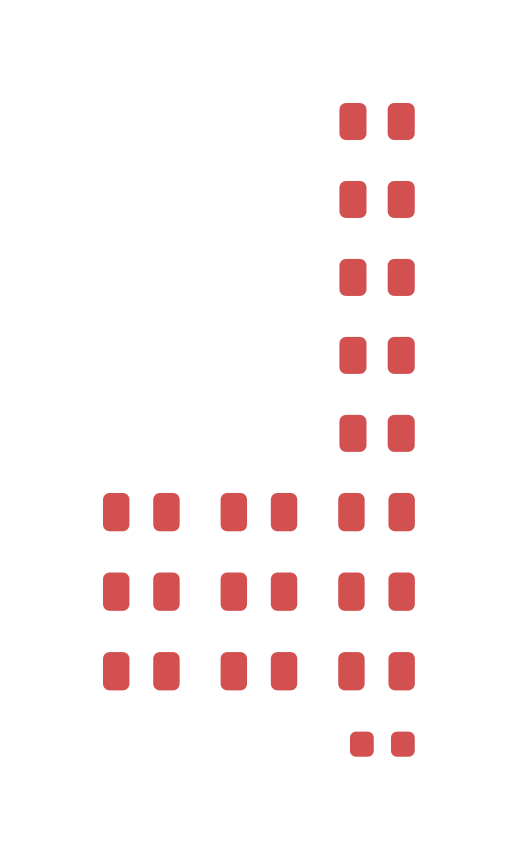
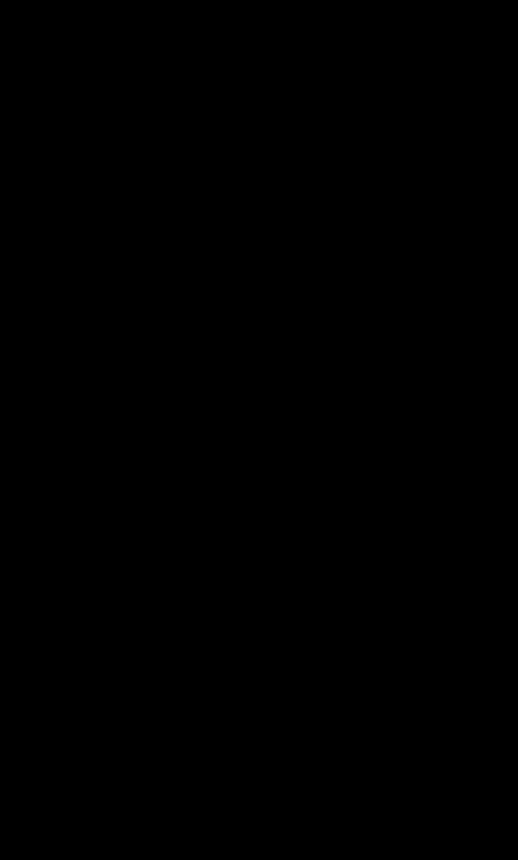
part: (377, 121) -> none
part: (377, 199) -> none
part: (377, 277) -> none
part: (377, 355) -> none
part: (377, 433) -> none
part: (141, 512) -> none
part: (258, 512) -> none
part: (376, 512) -> none
part: (141, 591) -> none
part: (258, 591) -> none
part: (376, 591) -> none
part: (141, 671) -> none
part: (258, 671) -> none
part: (376, 671) -> none
part: (382, 744) -> none

